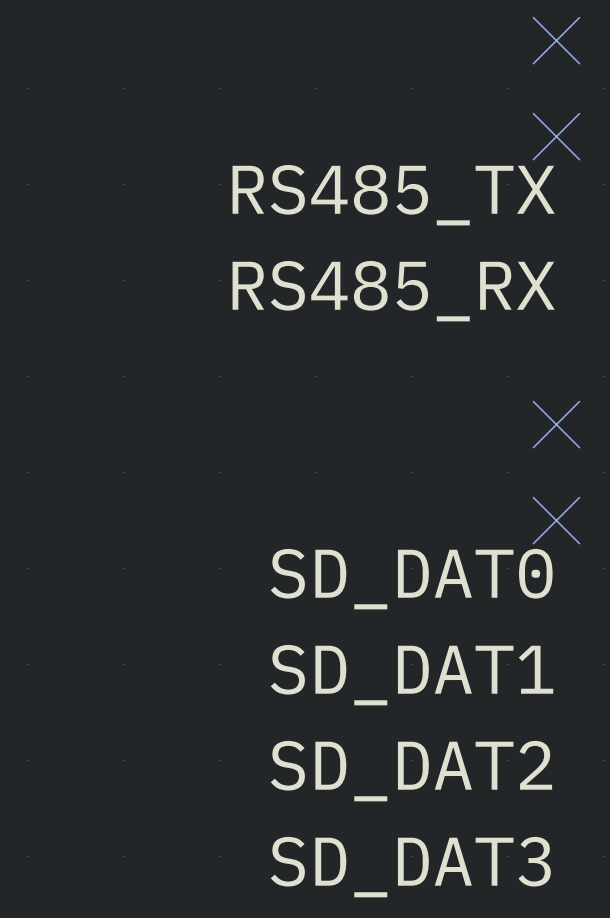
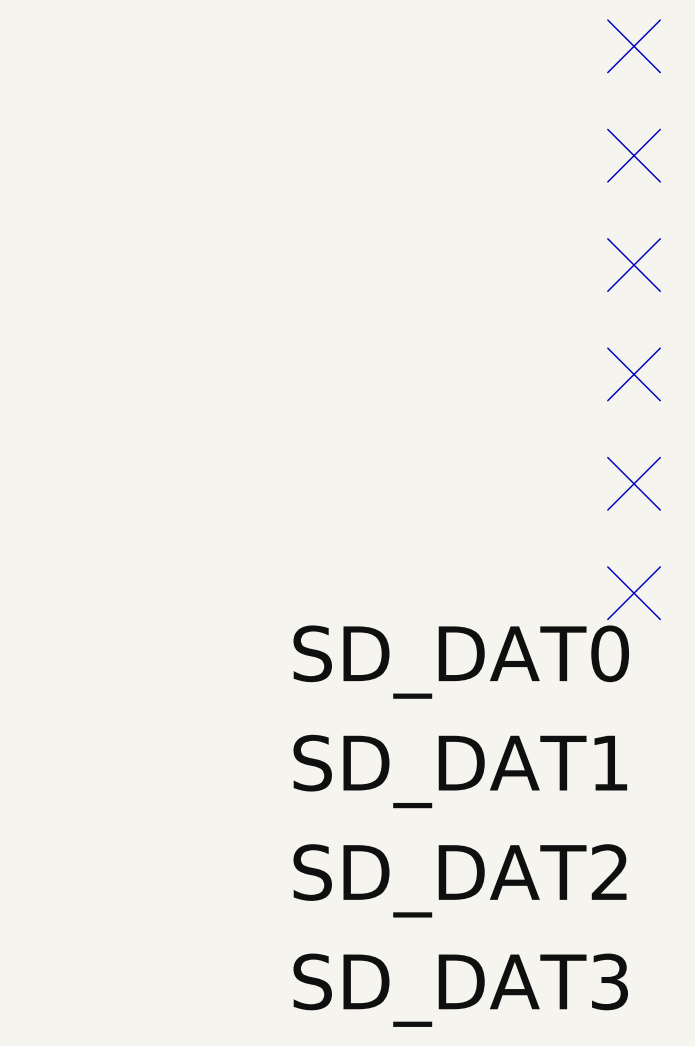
label: RS485_TX (393, 195) -> none
no-connect mark: none -> (634, 265)
label: RS485_RX (393, 291) -> none
no-connect mark: none -> (634, 374)

